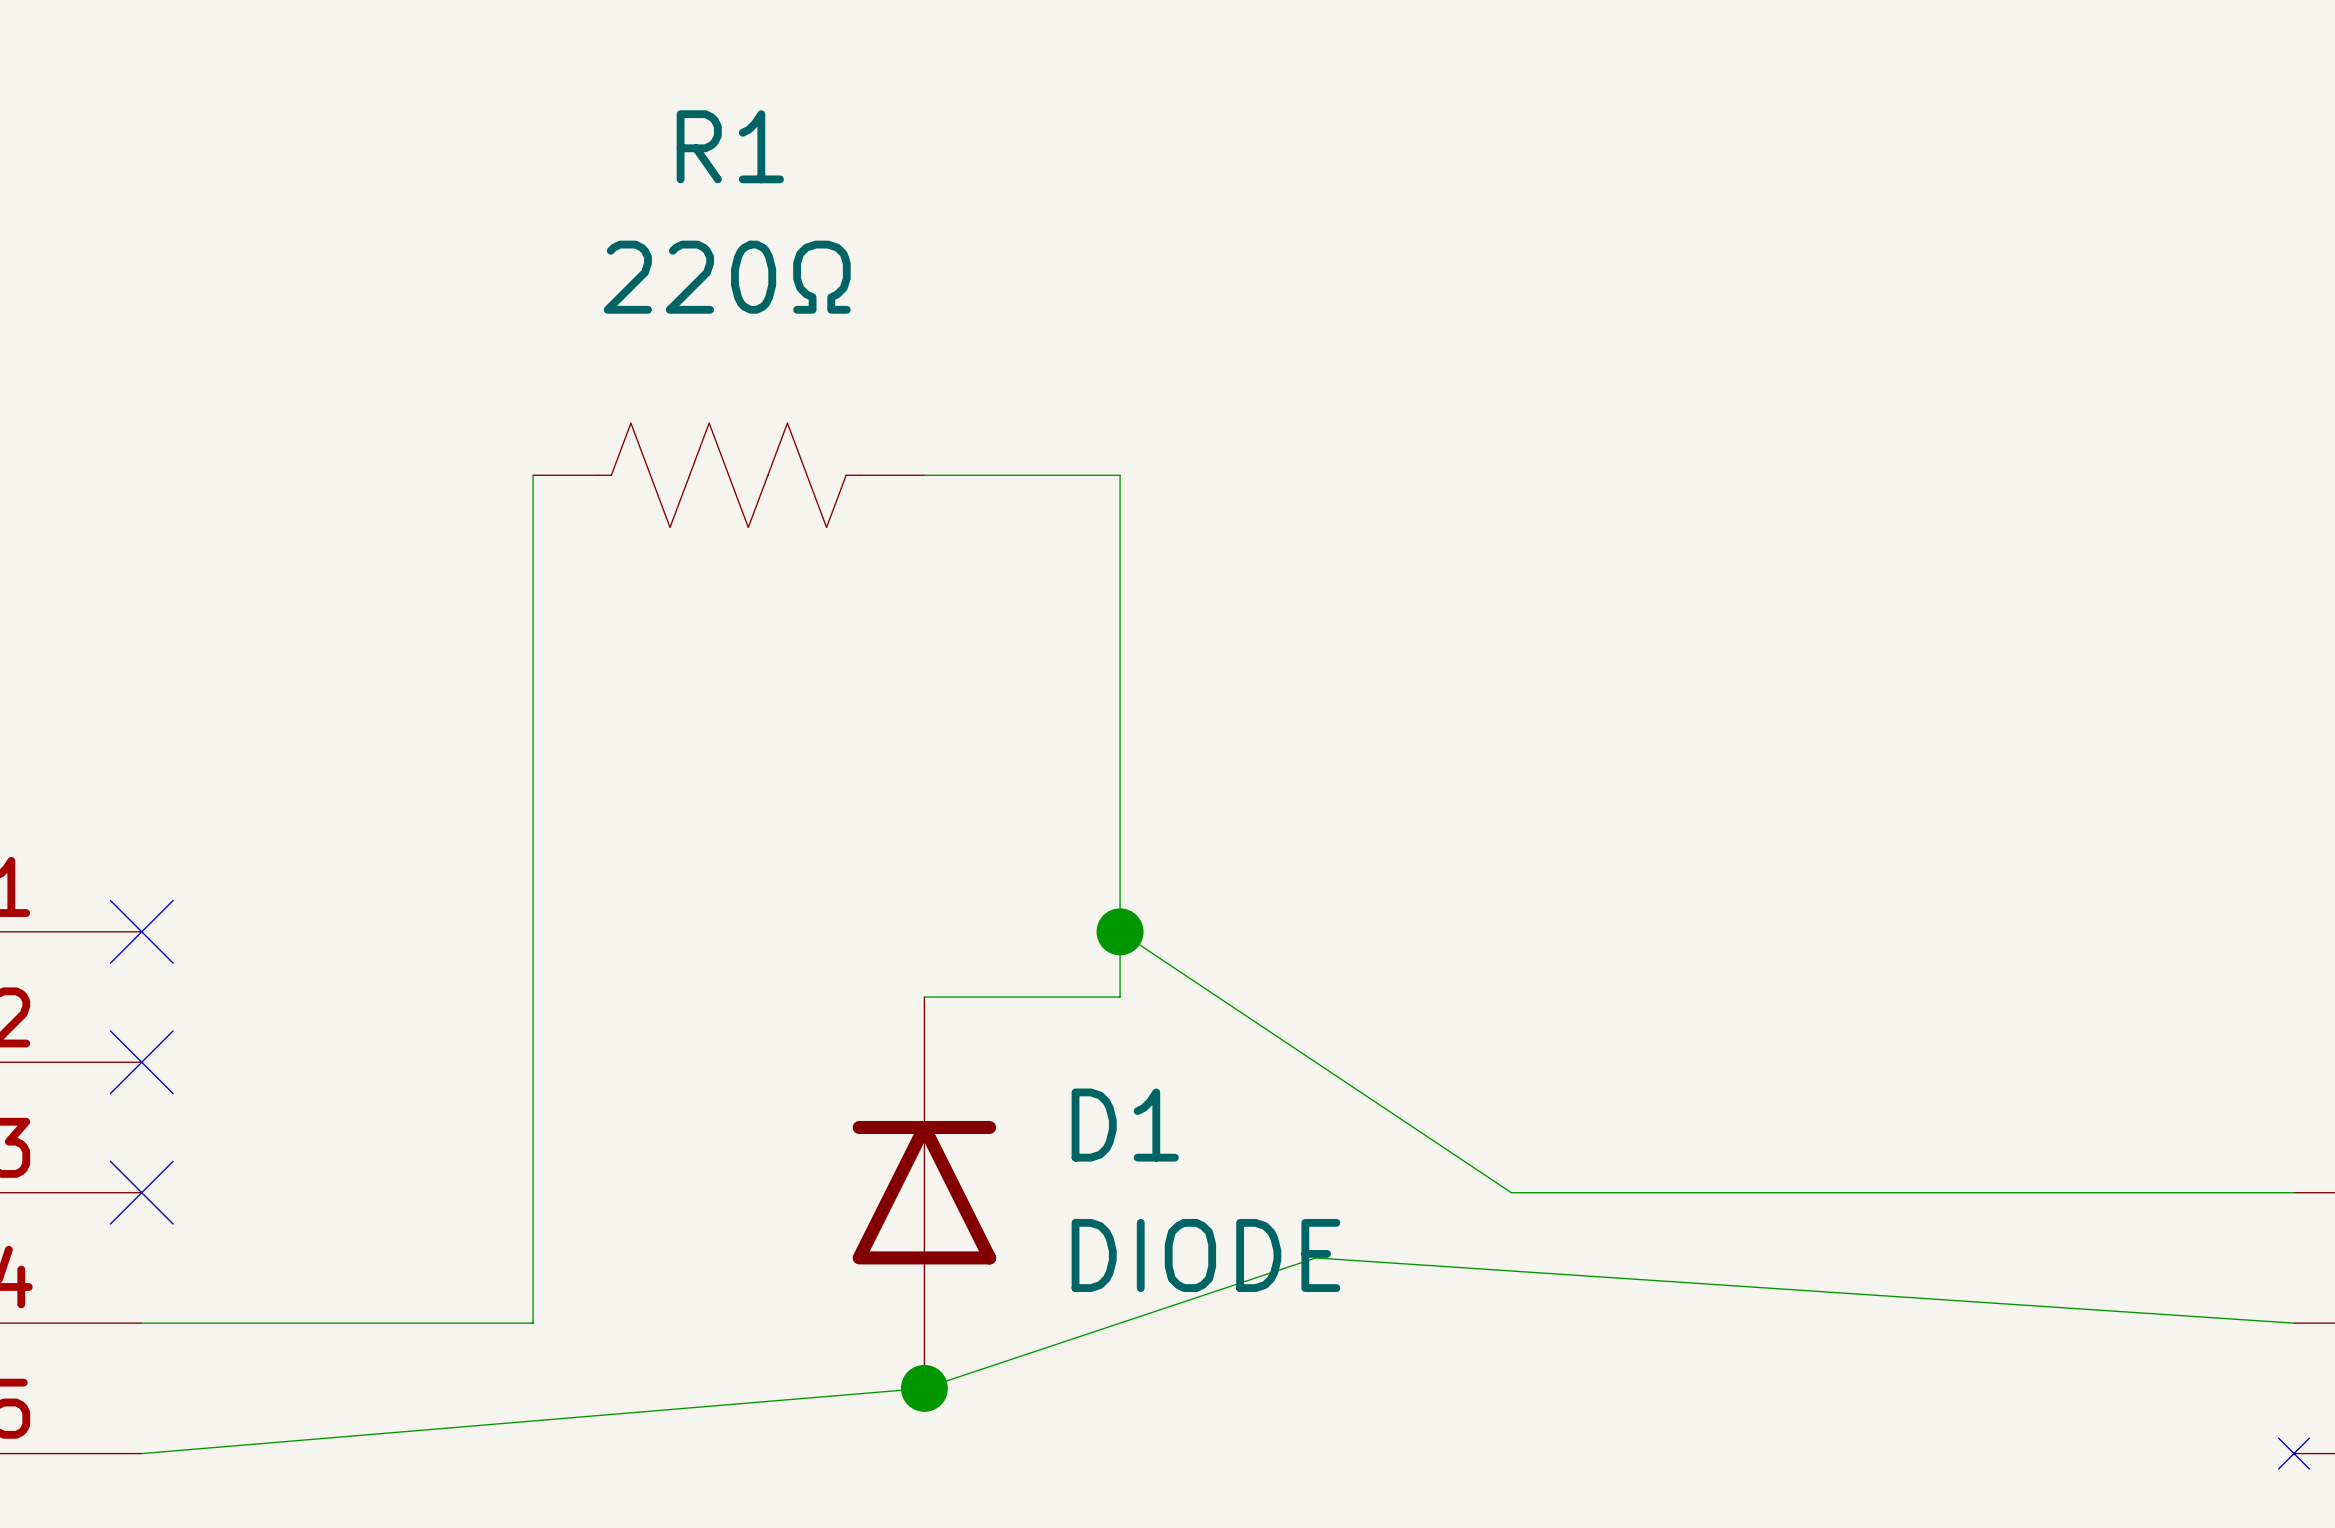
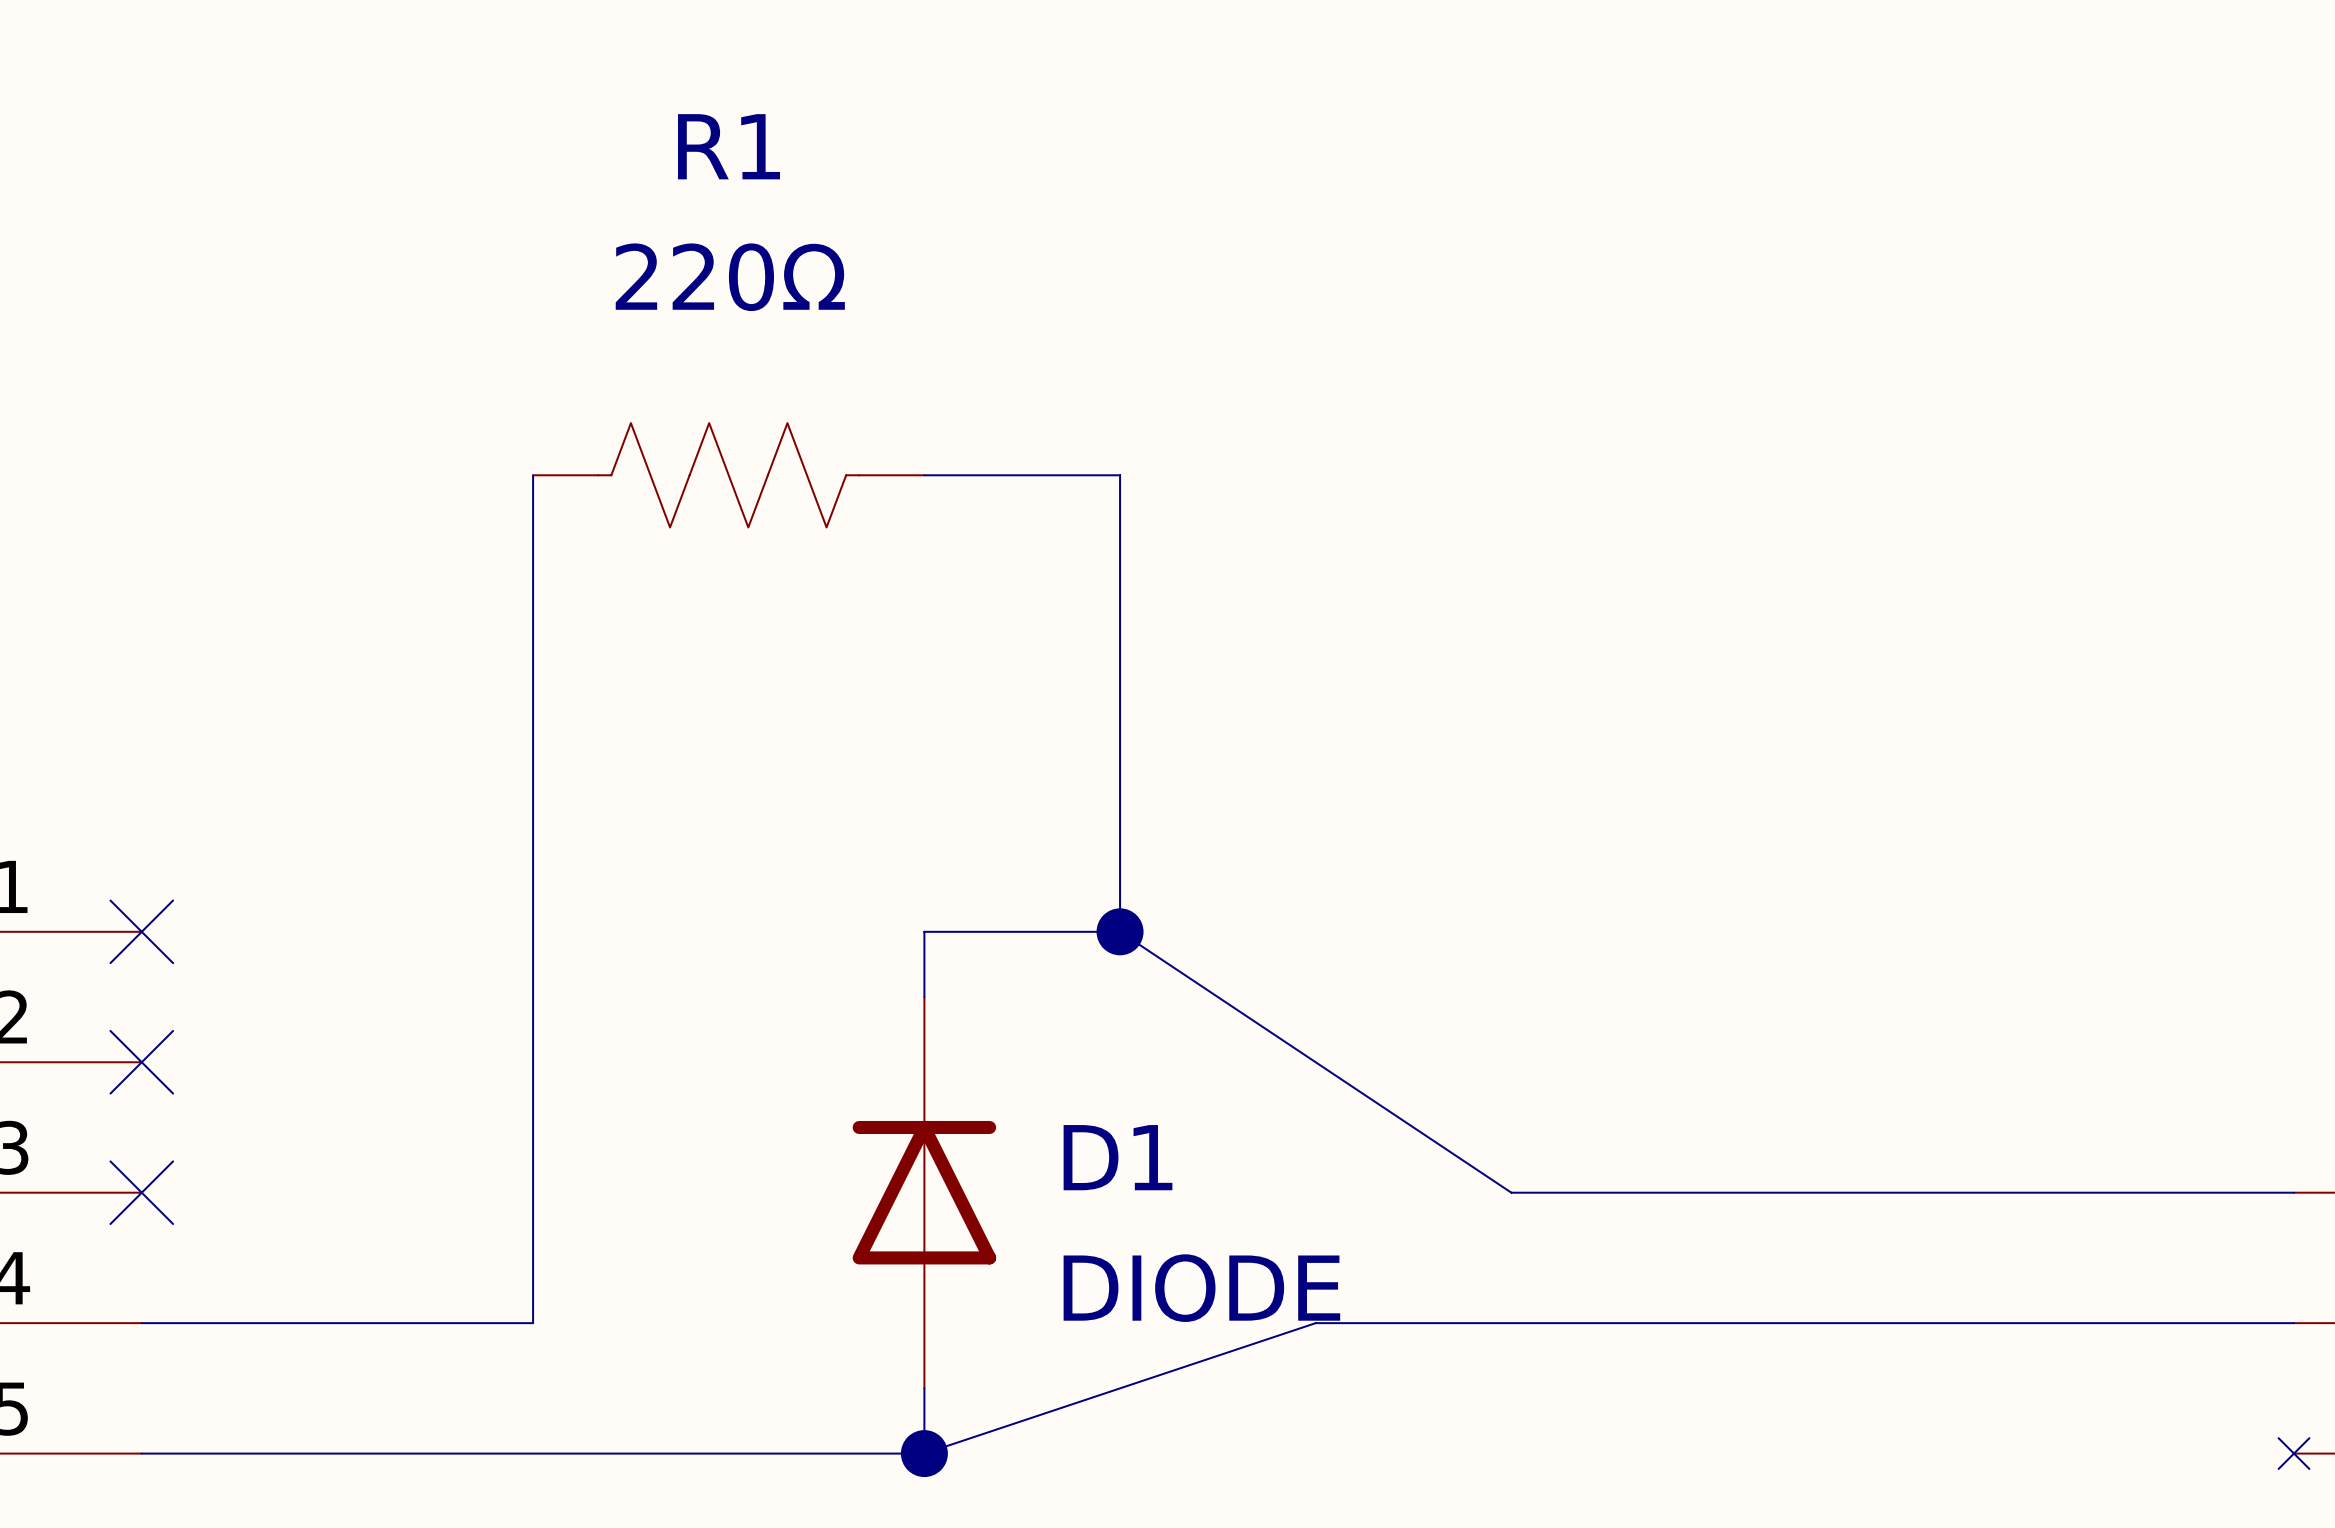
wire: (1120, 931) (1120, 997) (924, 997) -> (1120, 931) (924, 931) (924, 997)
D1 name position: D1 (1125, 1125) -> D1 (1118, 1157)
D1 value position: DIODE (1205, 1255) -> DIODE (1201, 1288)
wire: (2294, 1323) (1315, 1257) (924, 1388) (141, 1453) -> (2294, 1323) (1315, 1323) (924, 1453)
wire: none -> (924, 1388) (924, 1453)
junction position: (924, 1388) -> (924, 1453)
wire: none -> (141, 1453) (924, 1453)

